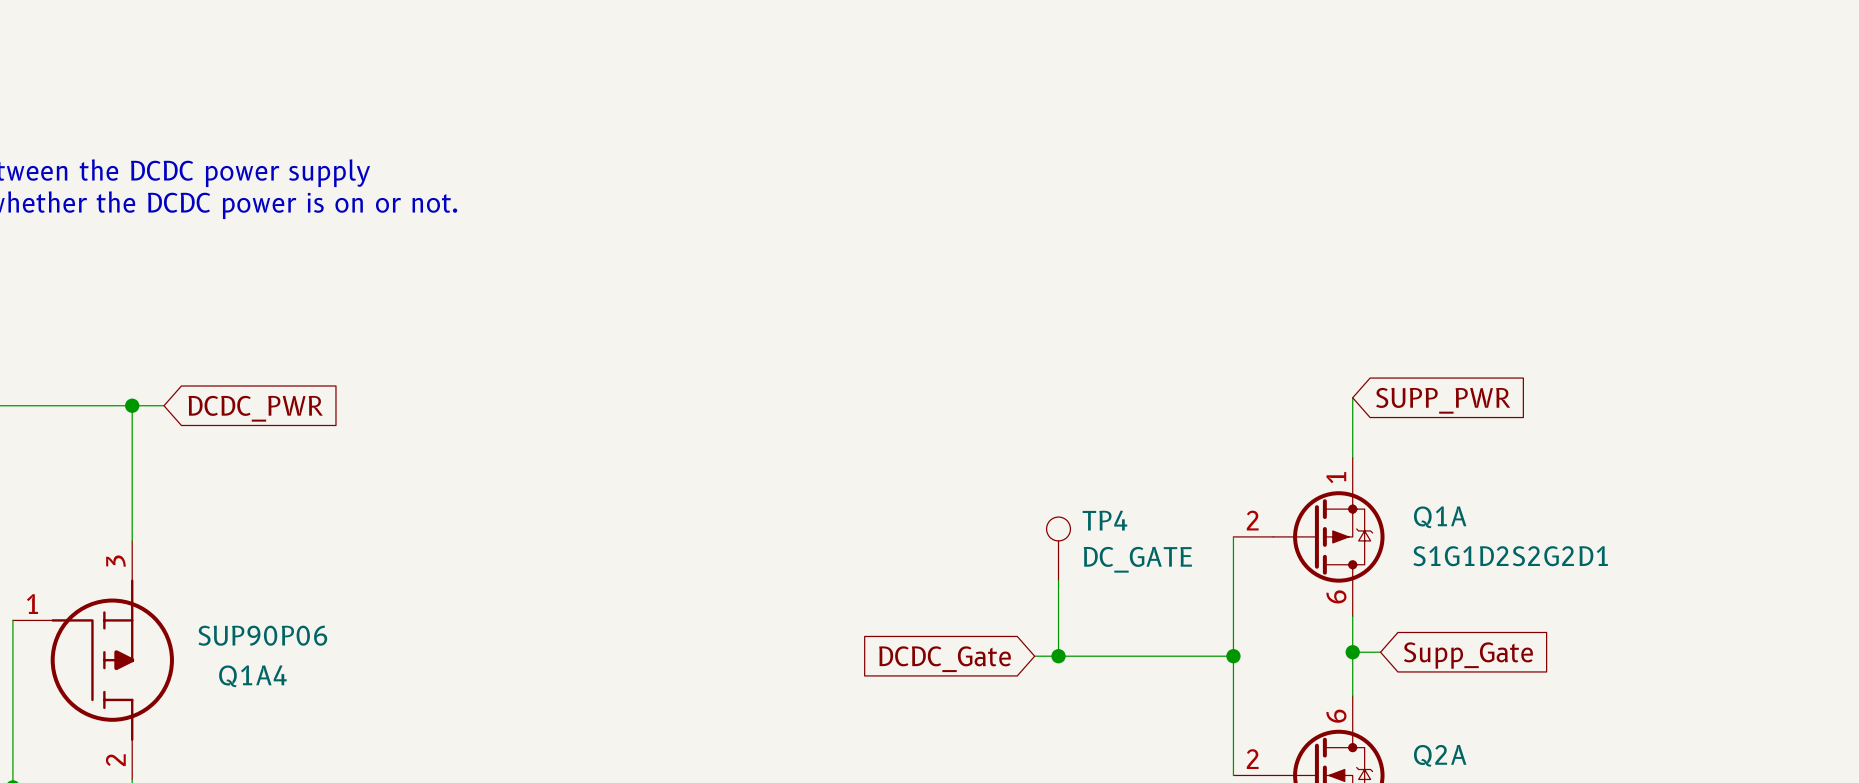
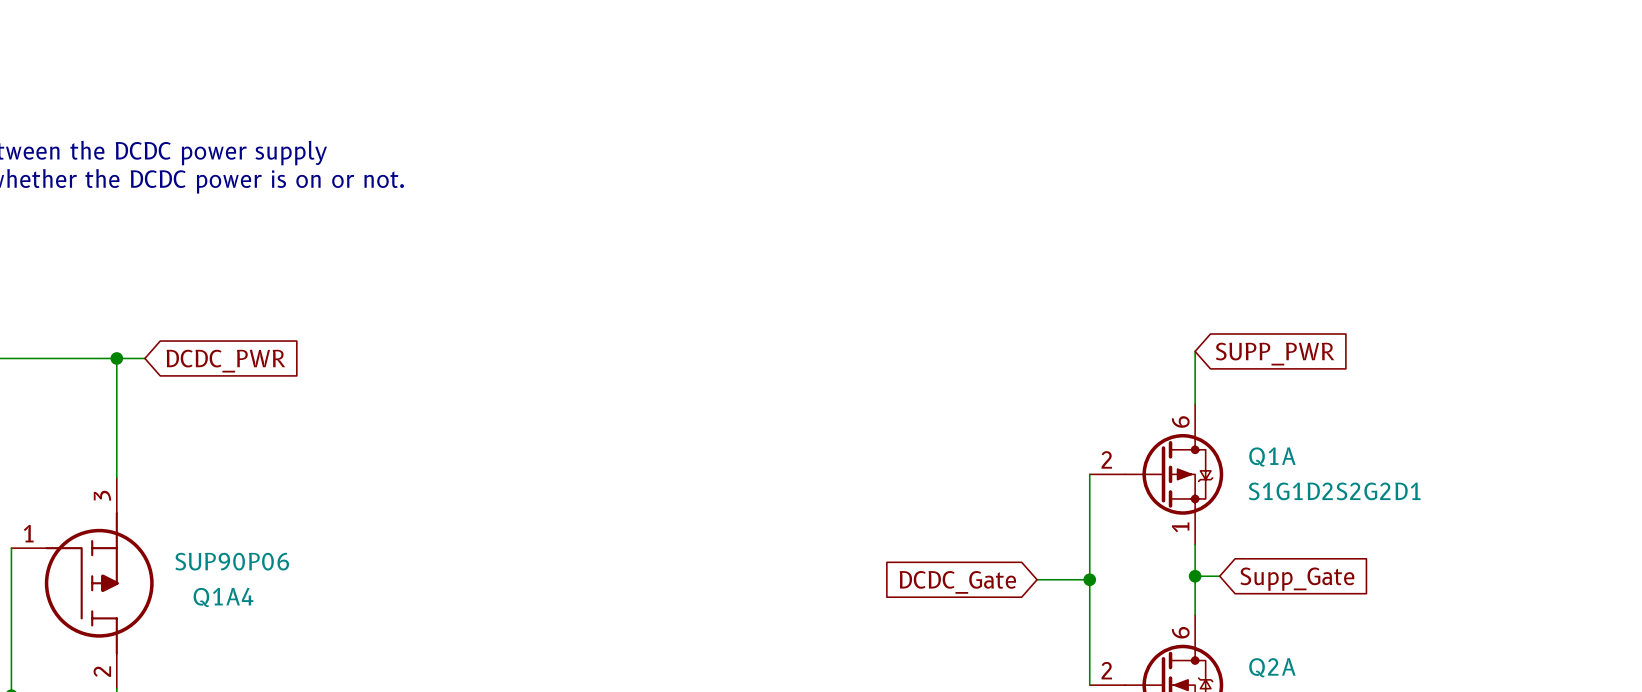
Q1A flip: as is (1328, 536) -> up-down (1174, 474)
TP4: DC_GATE (1058, 548) -> none
wire: (1058, 580) (1058, 656) -> none
wire: (1034, 656) (1173, 656) -> none
junction: (1058, 656) -> none
global label position: DCDC_Gate (945, 659) -> DCDC_Gate (957, 582)

